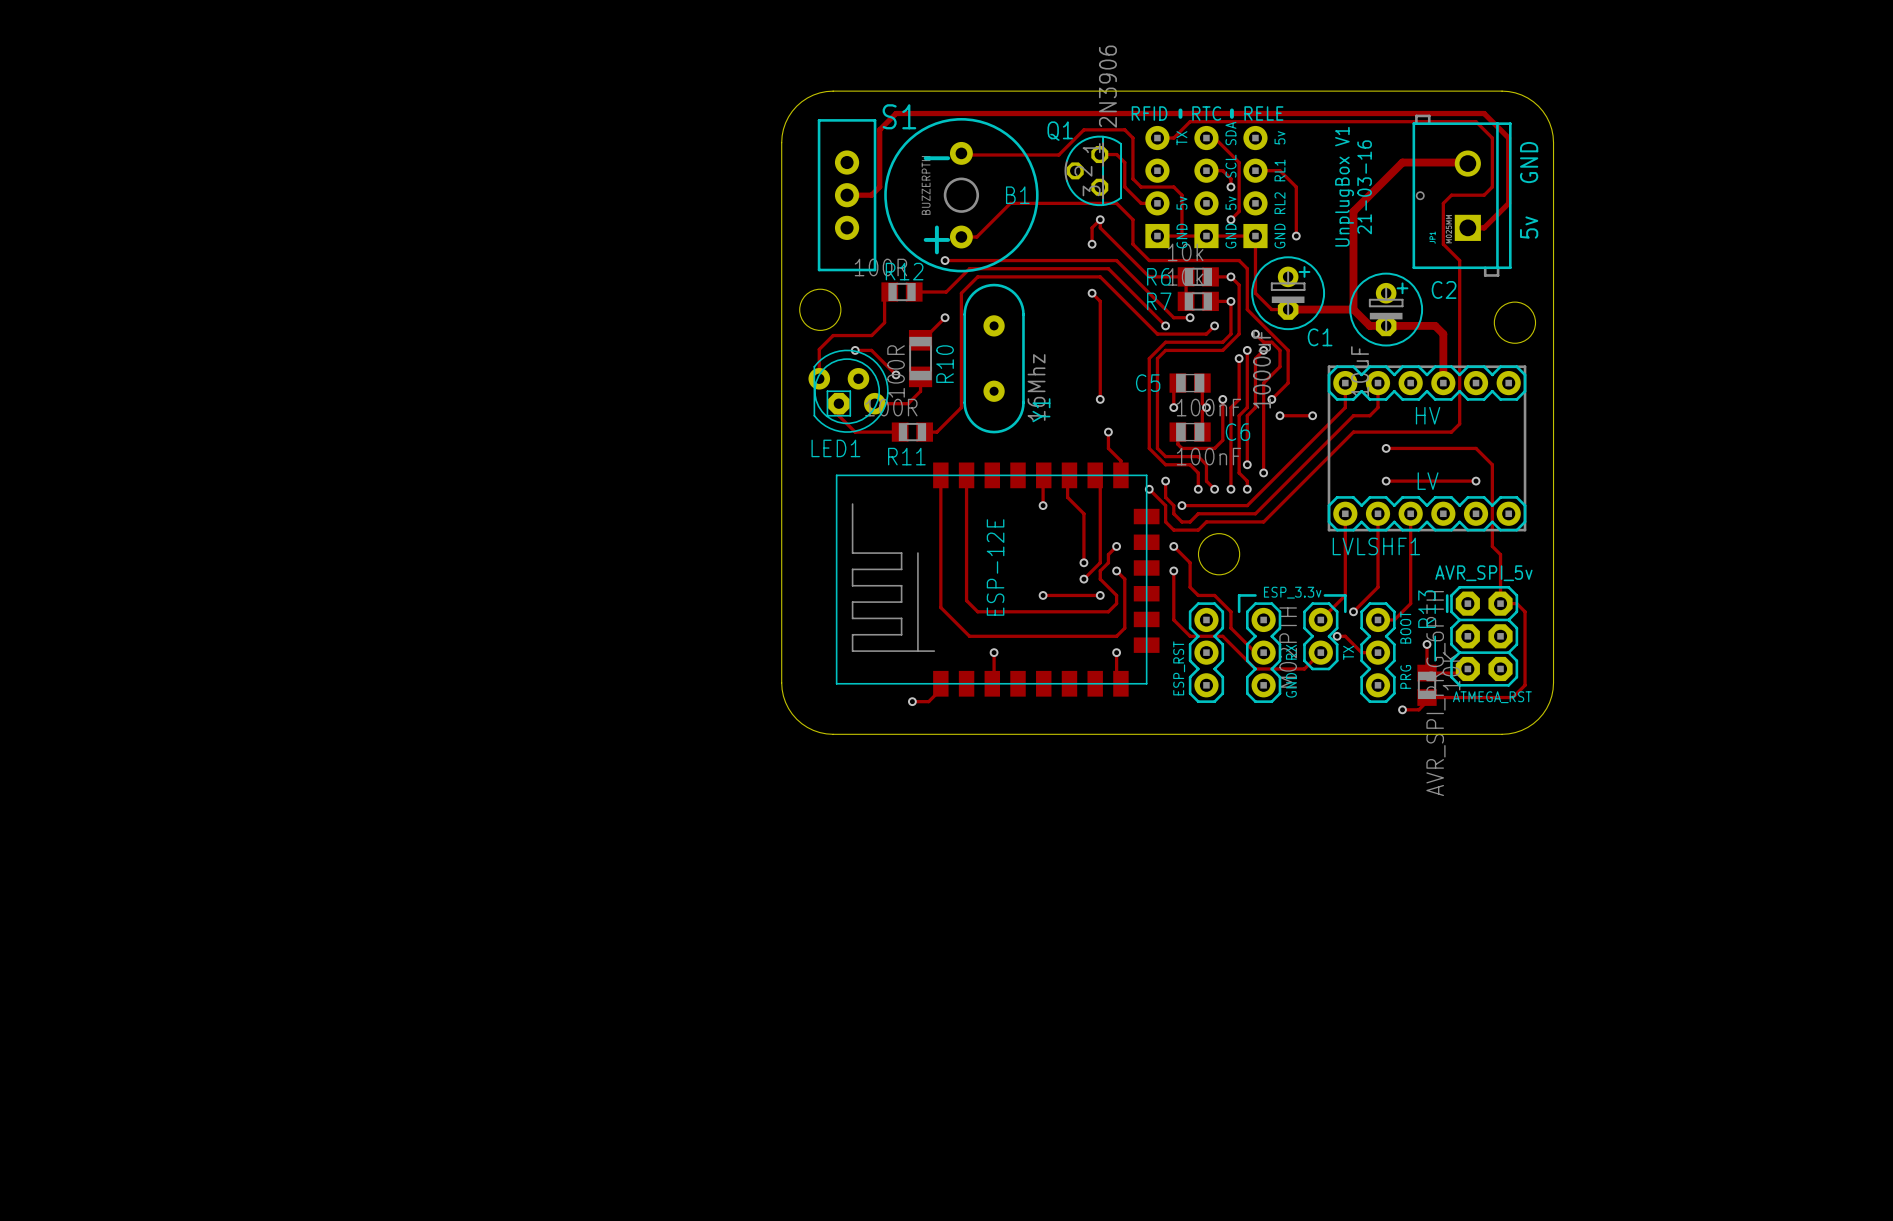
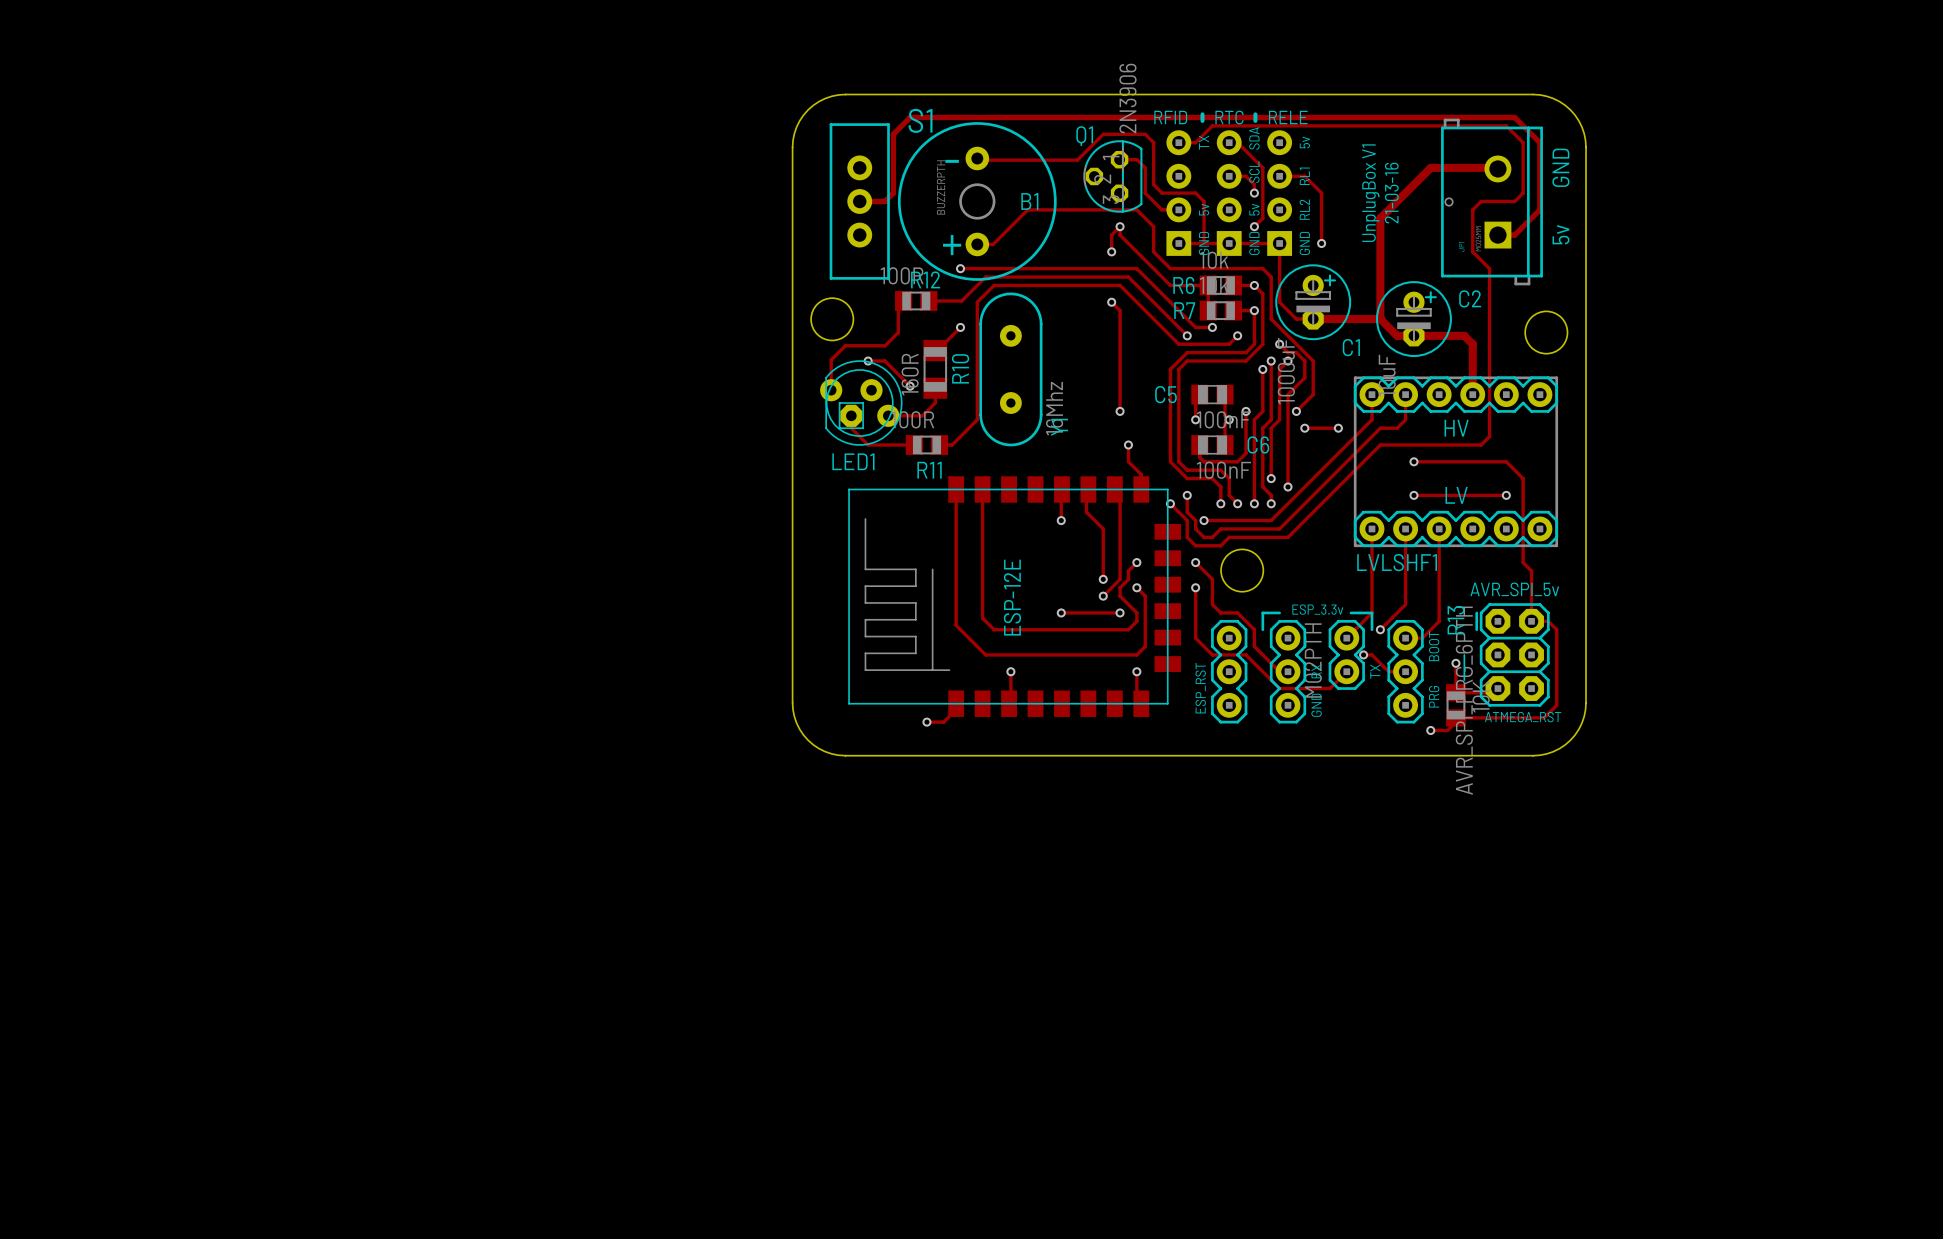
R10 value: 100R (896, 371) -> 160R (910, 374)

